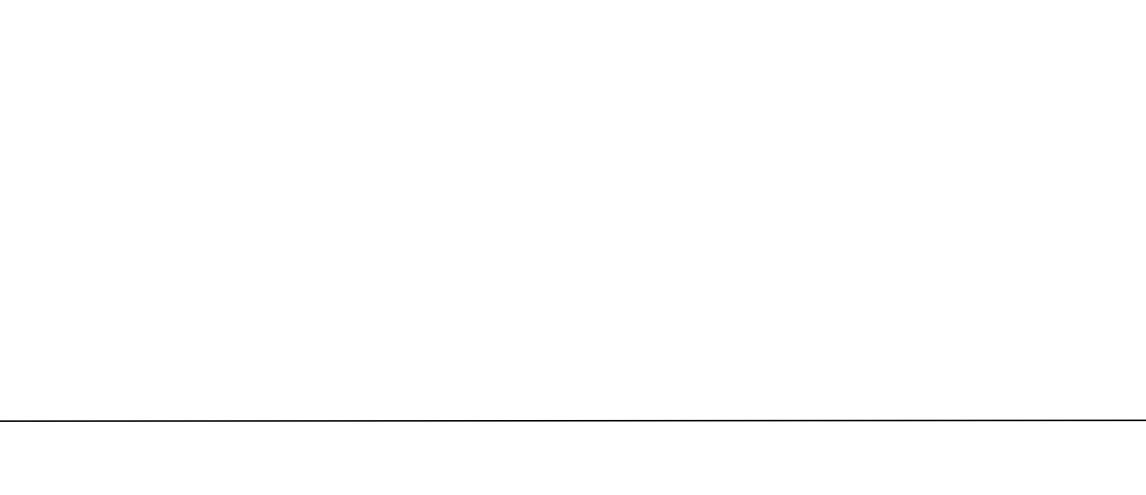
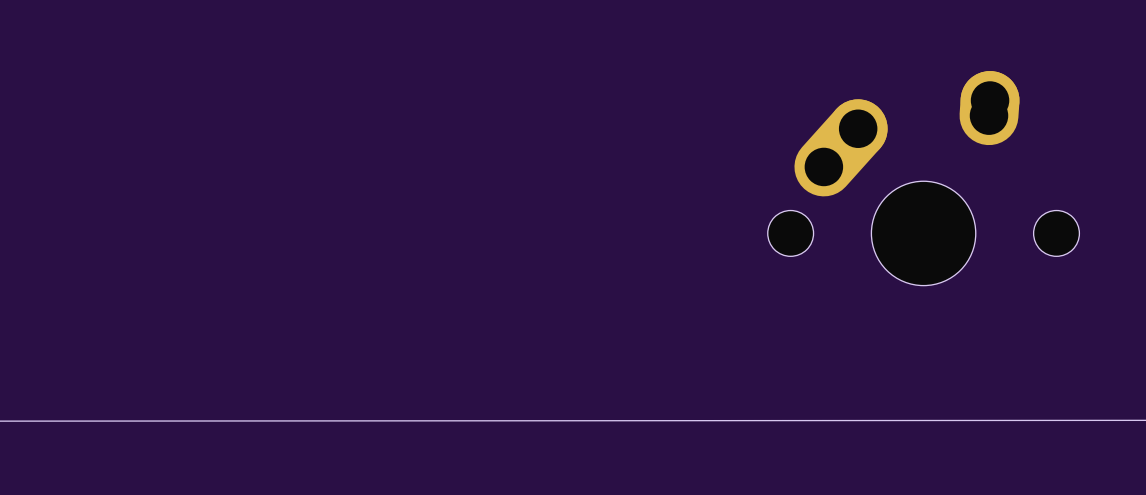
part: none -> (923, 178)

